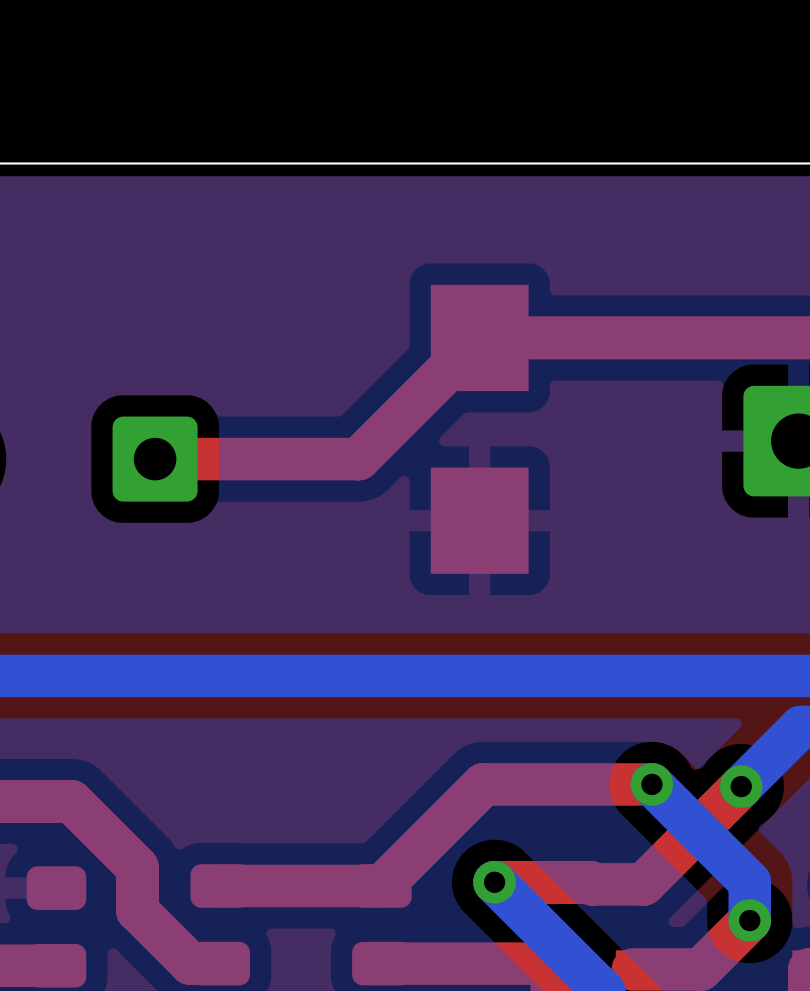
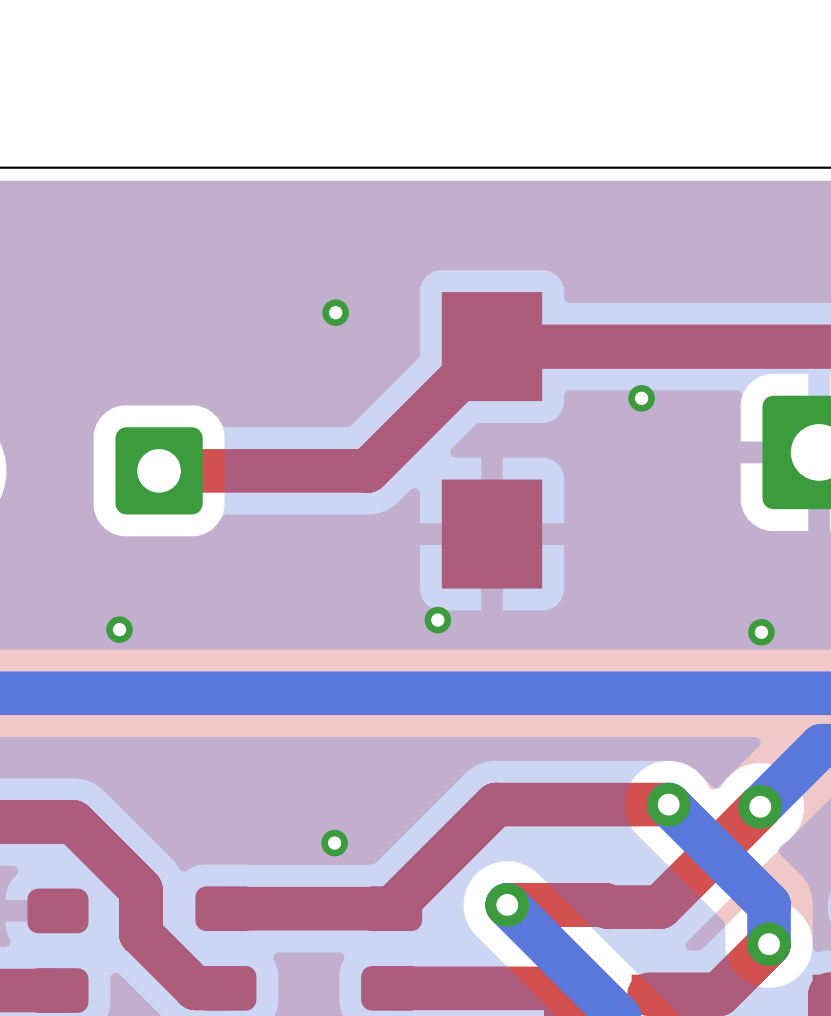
via: none -> (335, 312)
via: none -> (641, 398)
via: none -> (437, 620)
via: none -> (119, 629)
via: none -> (761, 632)
via: none -> (334, 843)

